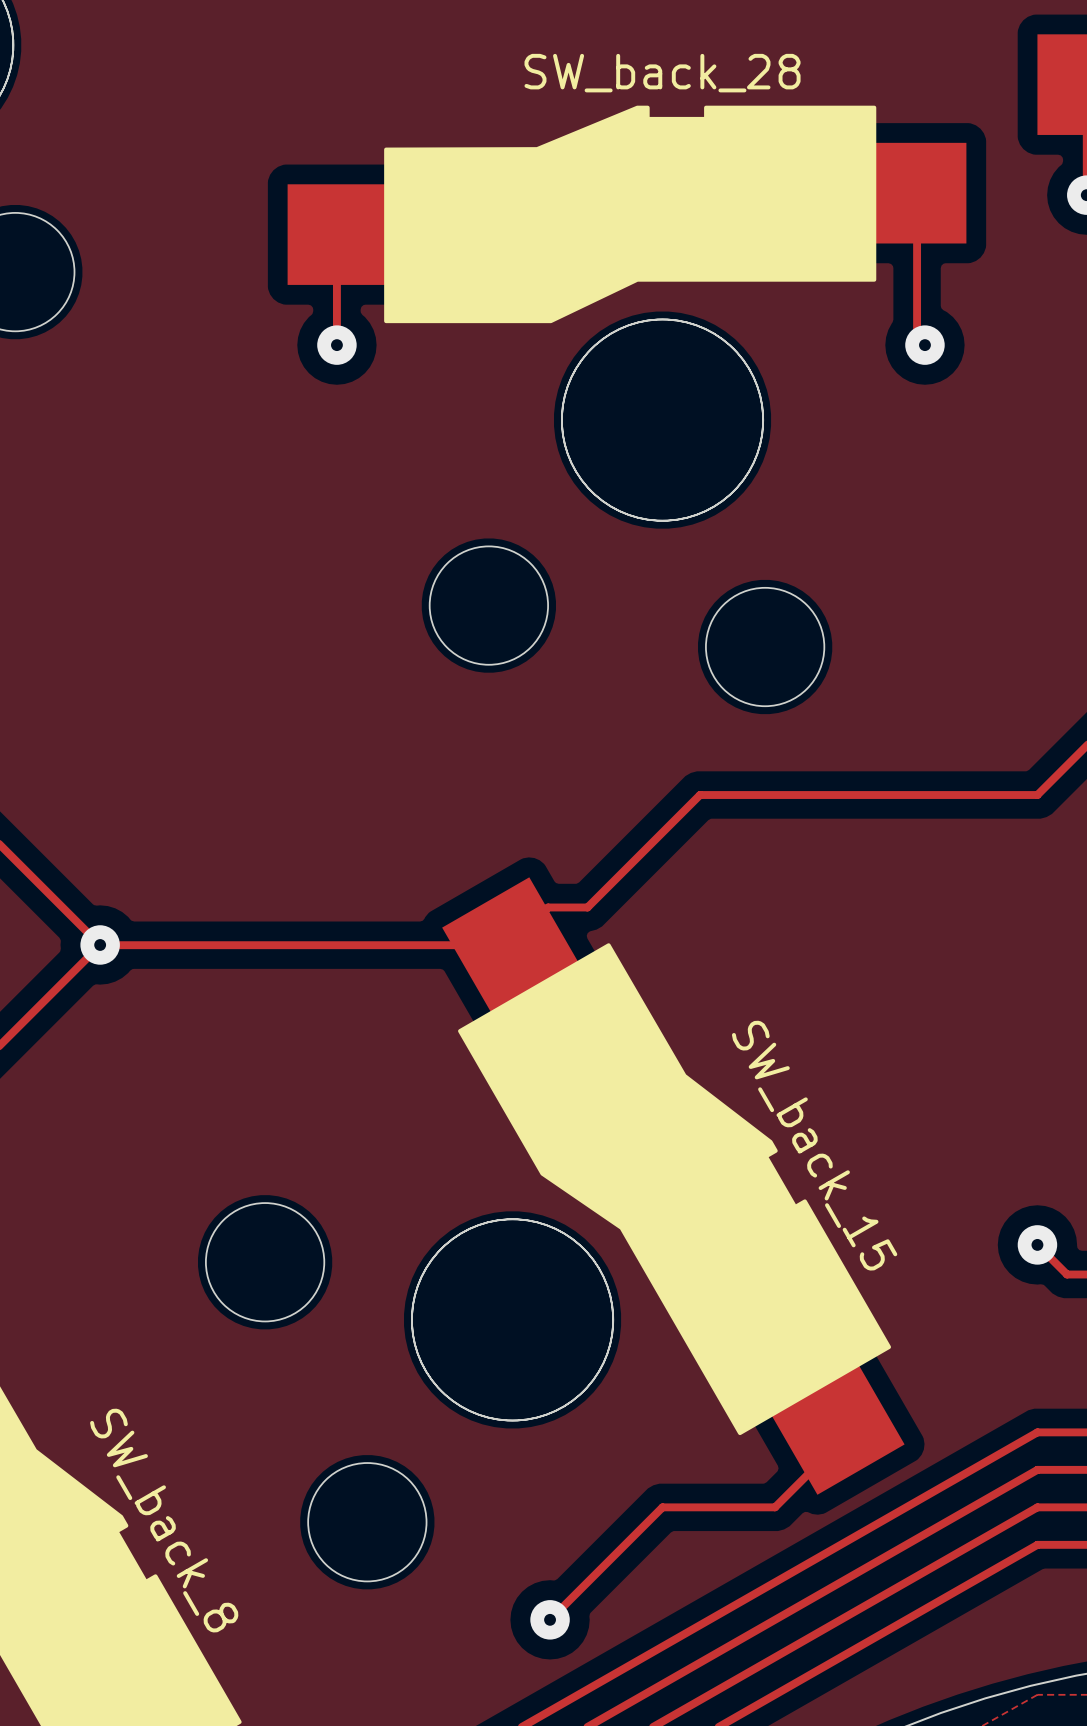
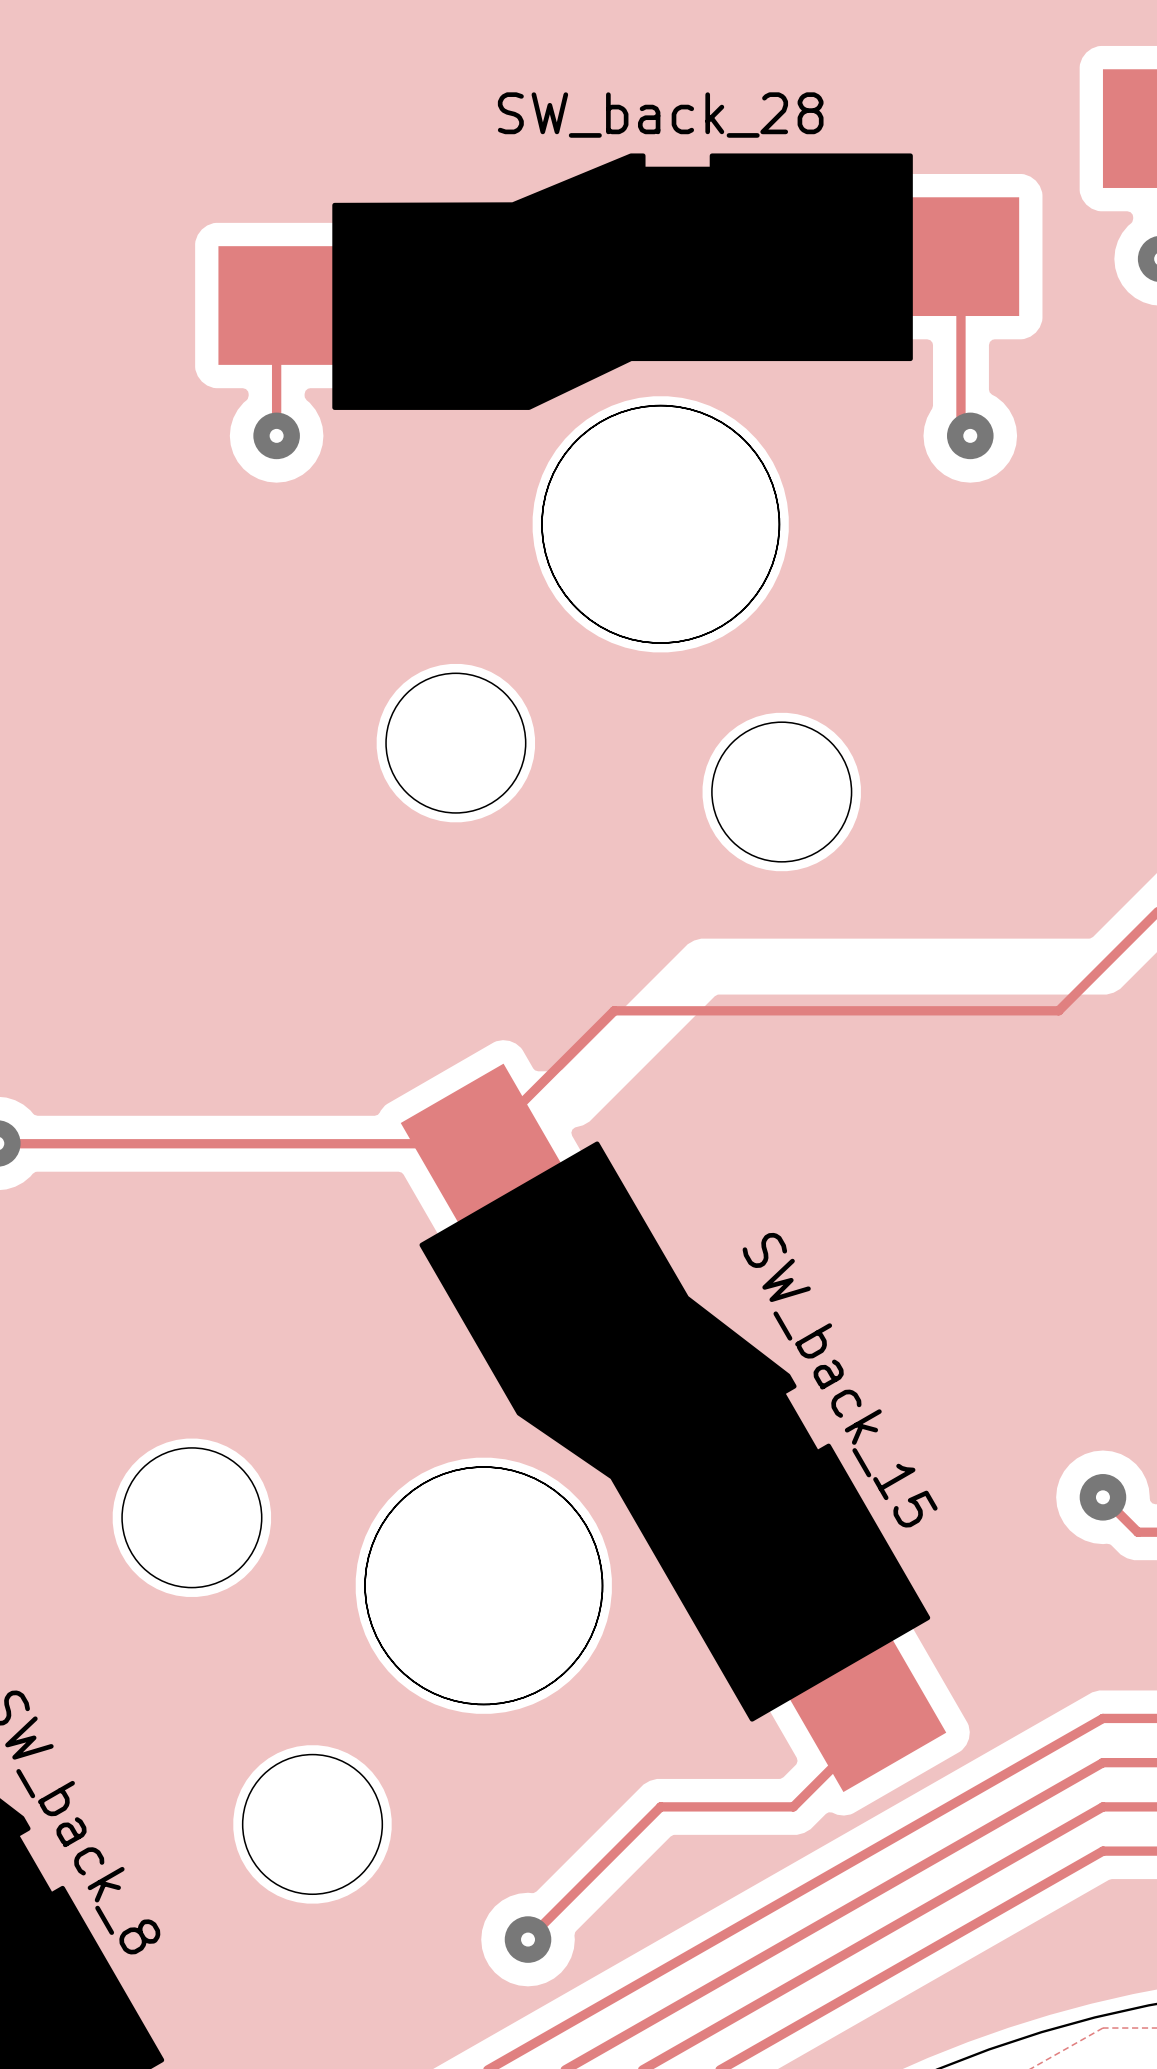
track: (1037, 795) (700, 795) (587, 907) (548, 907) -> (1102, 966) (1058, 1010) (614, 1010) (525, 1099)

